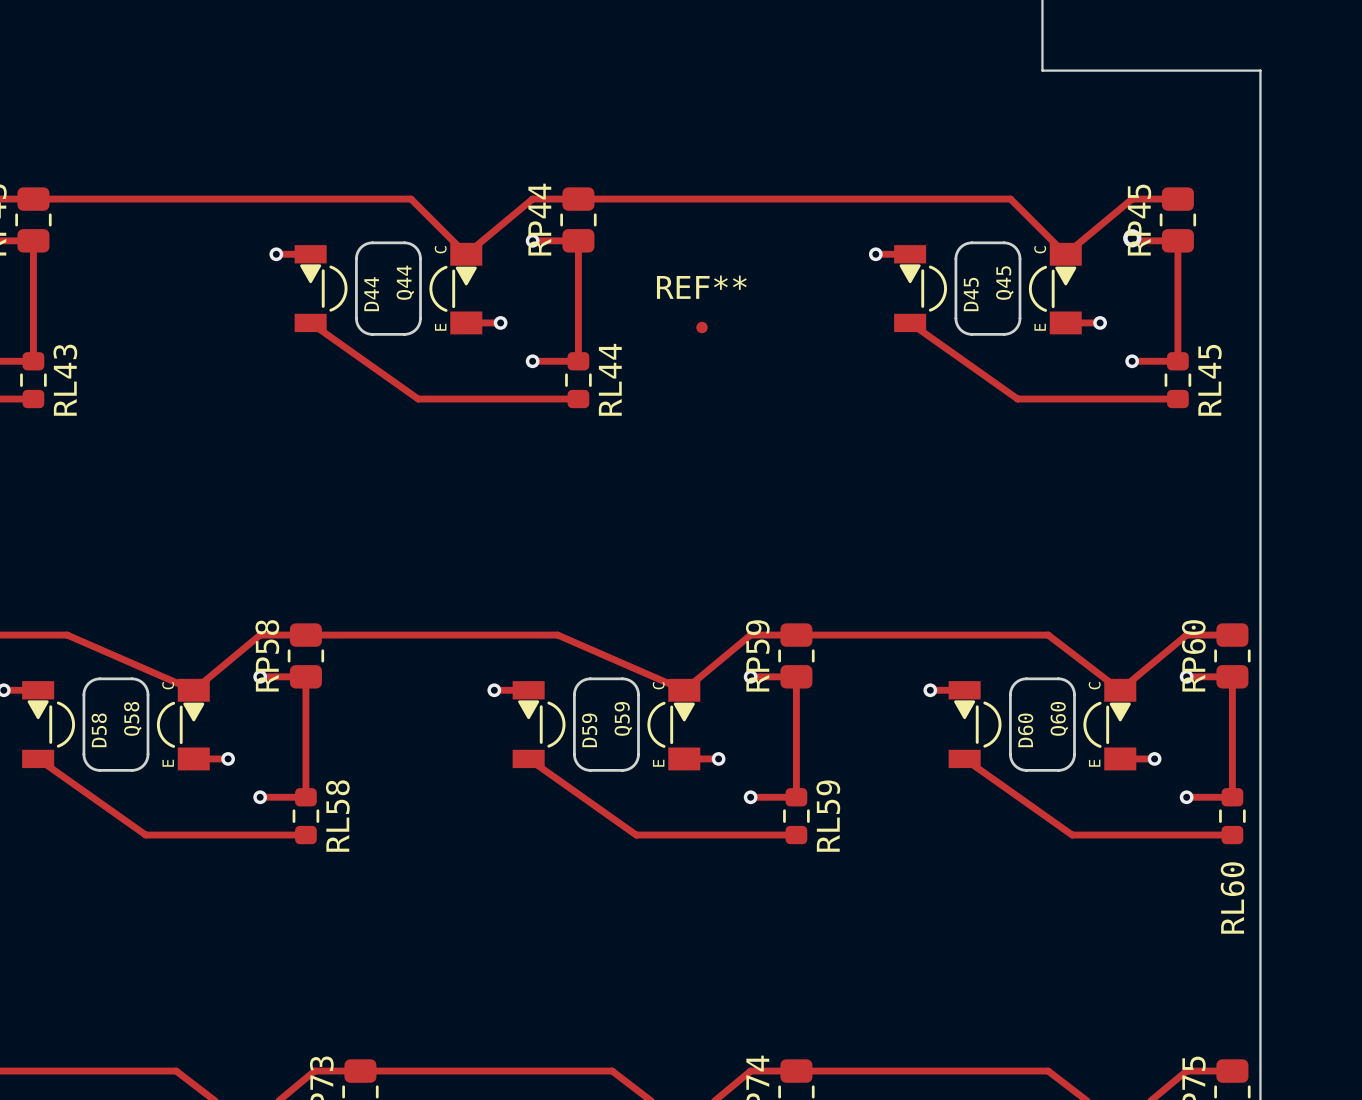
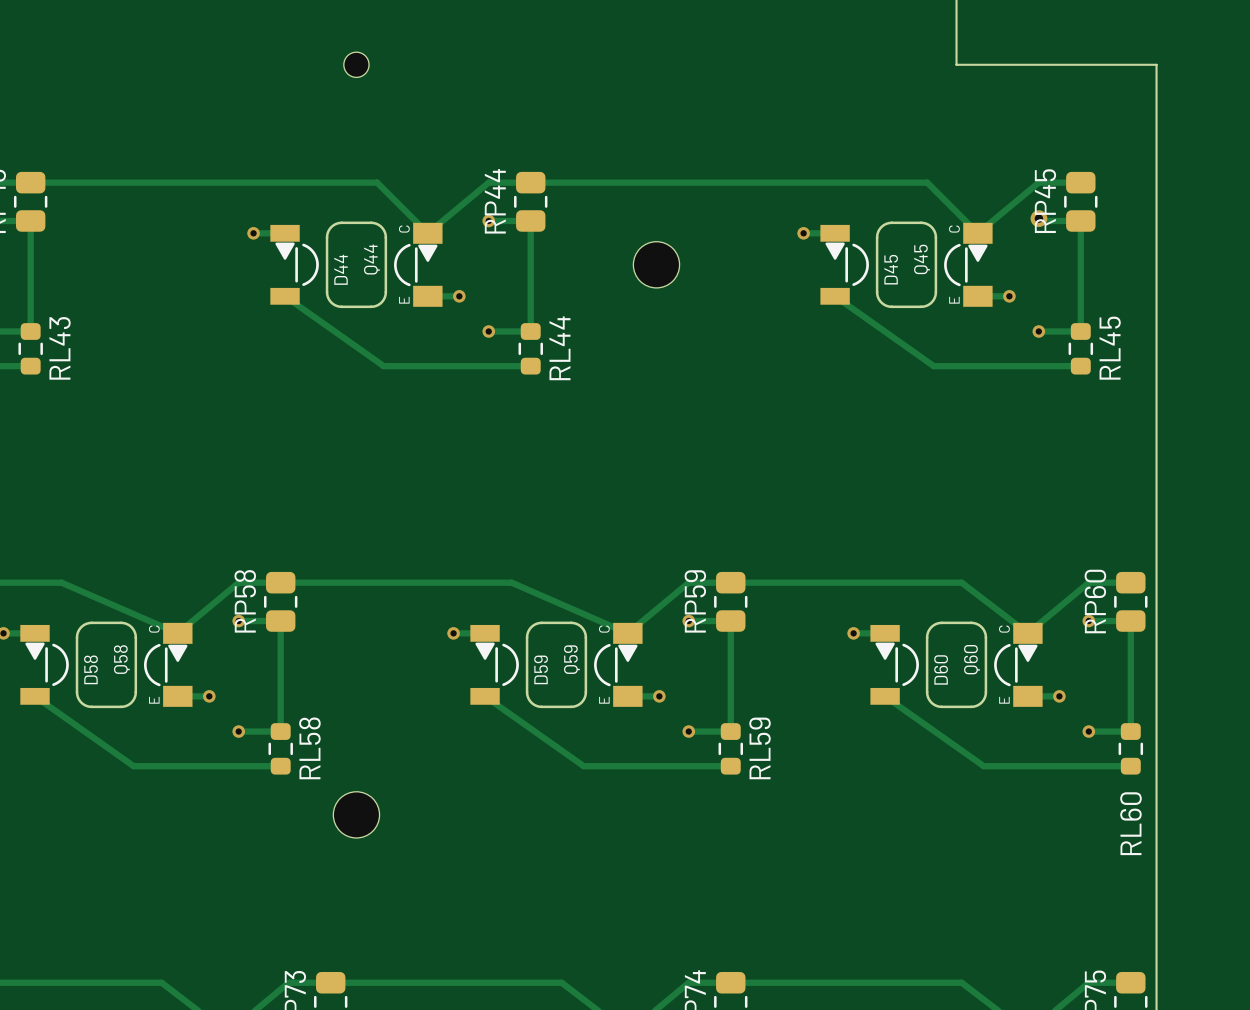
part: none -> (356, 64)
part: none -> (656, 264)
REF**: (702, 327) -> none
part: none -> (356, 814)

